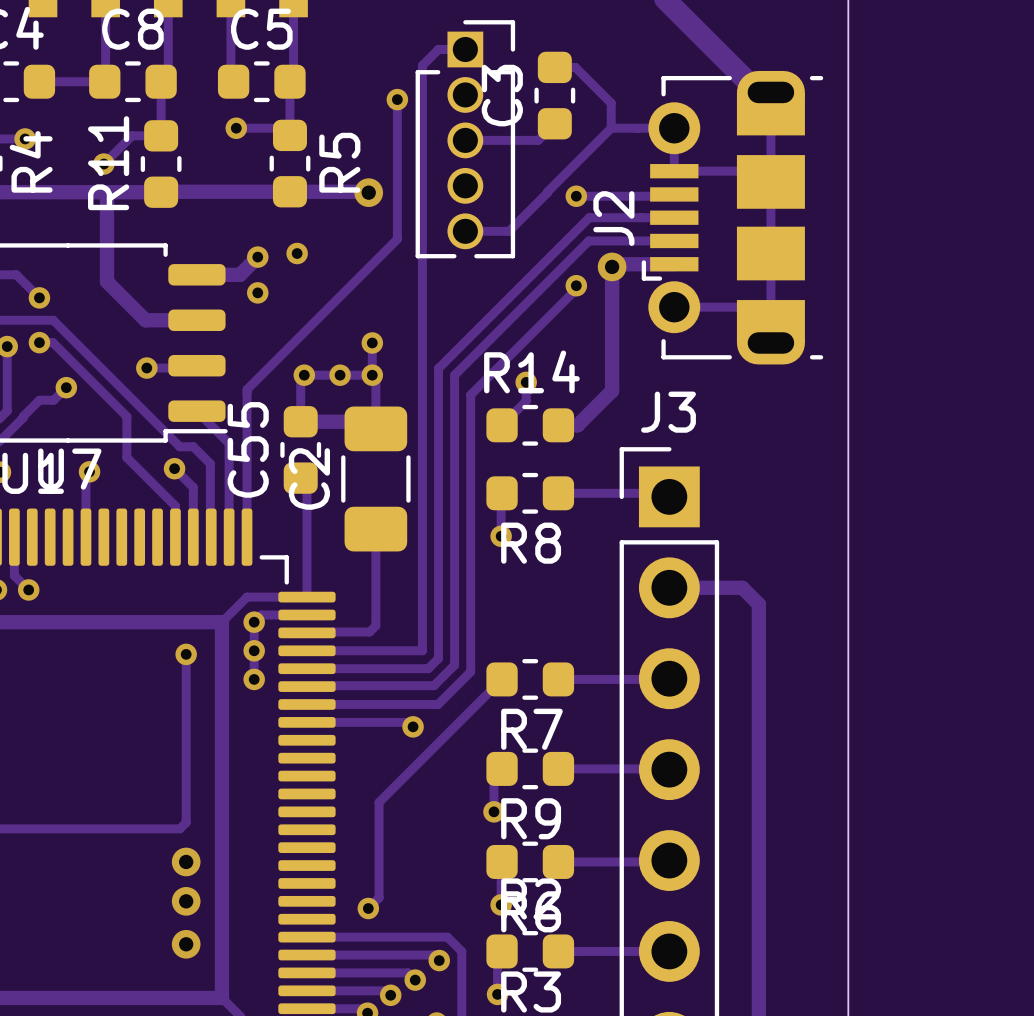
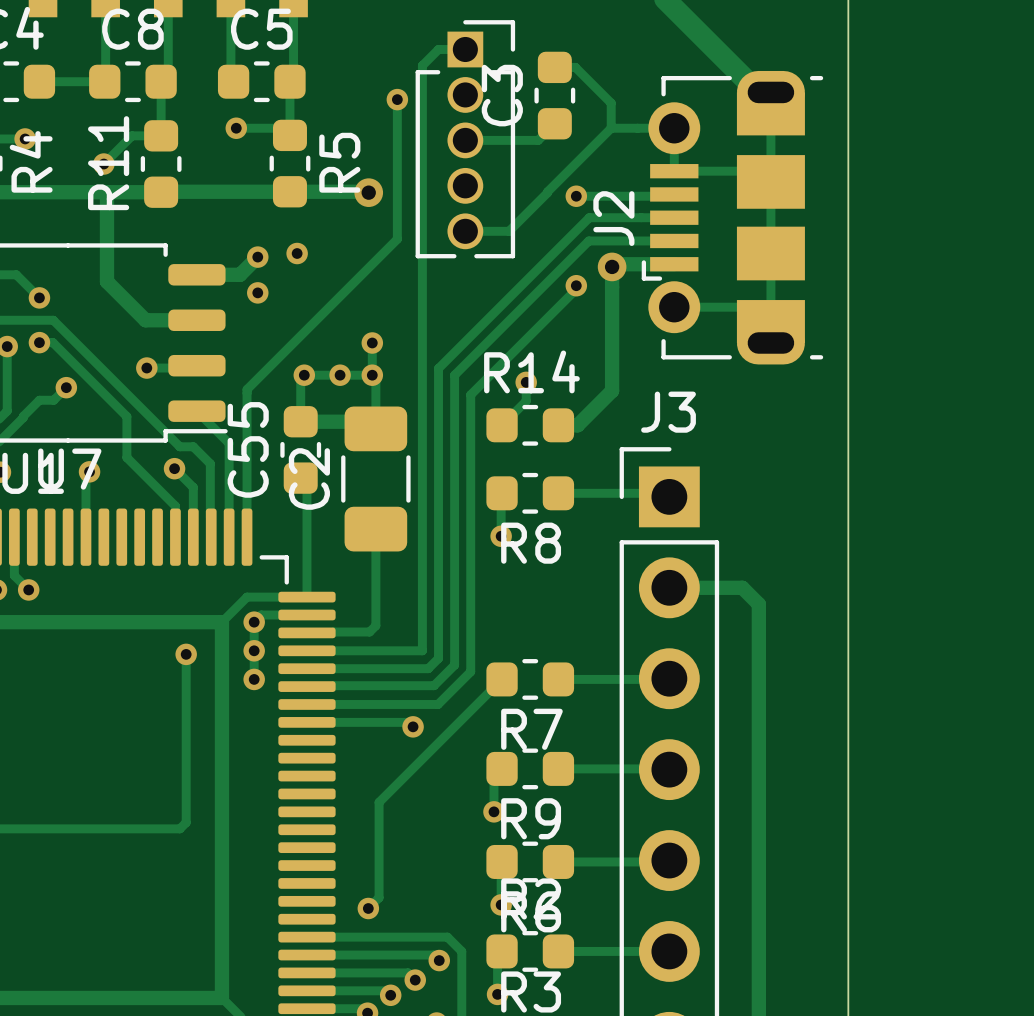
via: (186, 861) -> none
via: (186, 901) -> none
via: (186, 944) -> none

